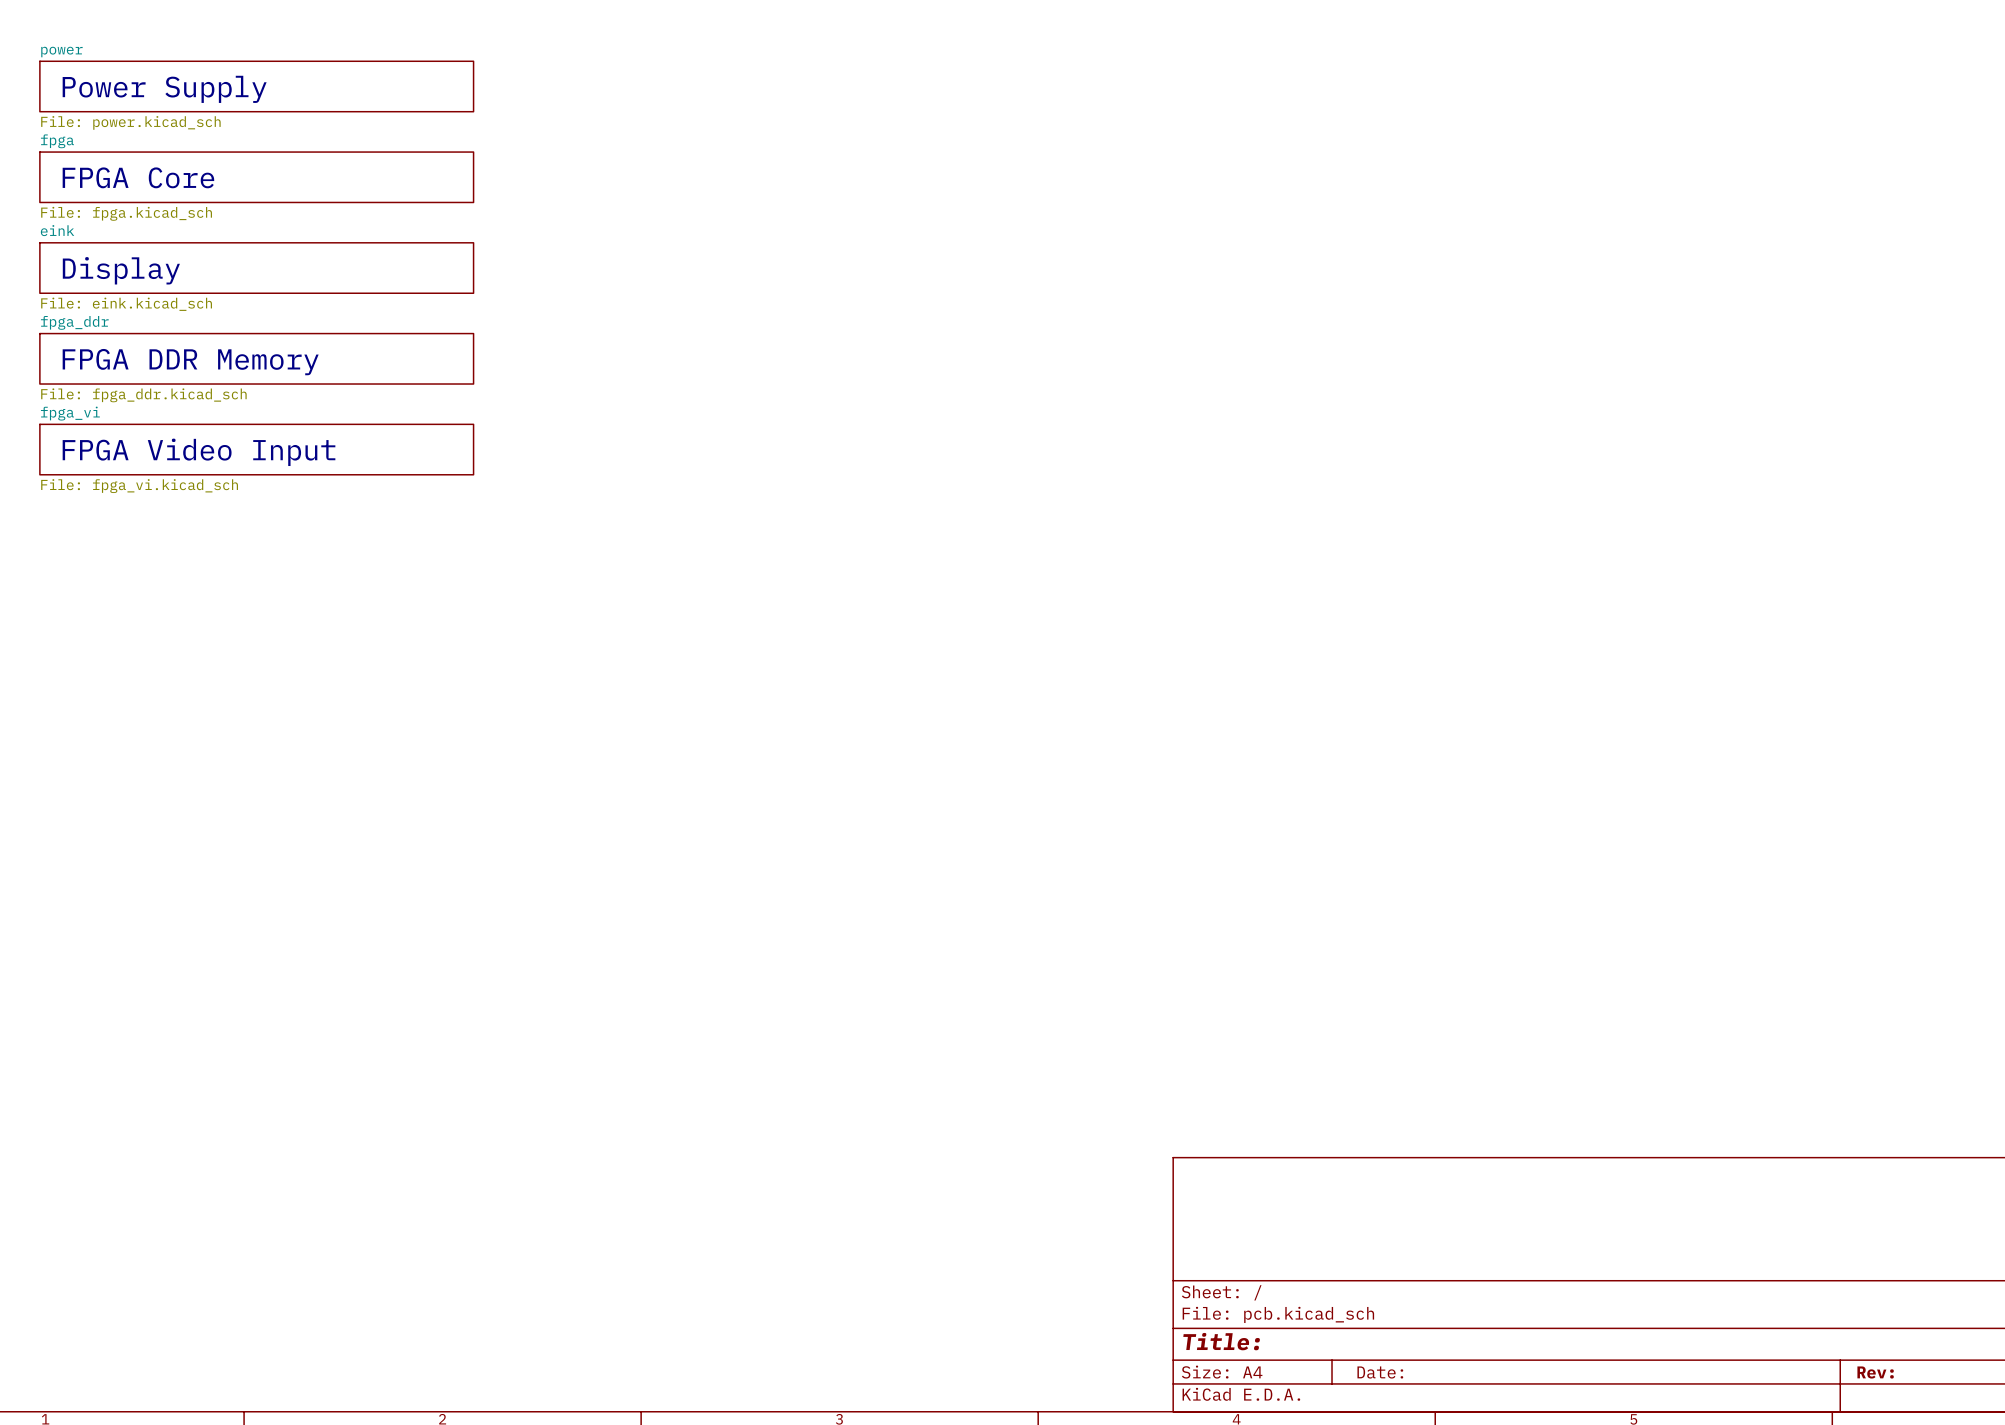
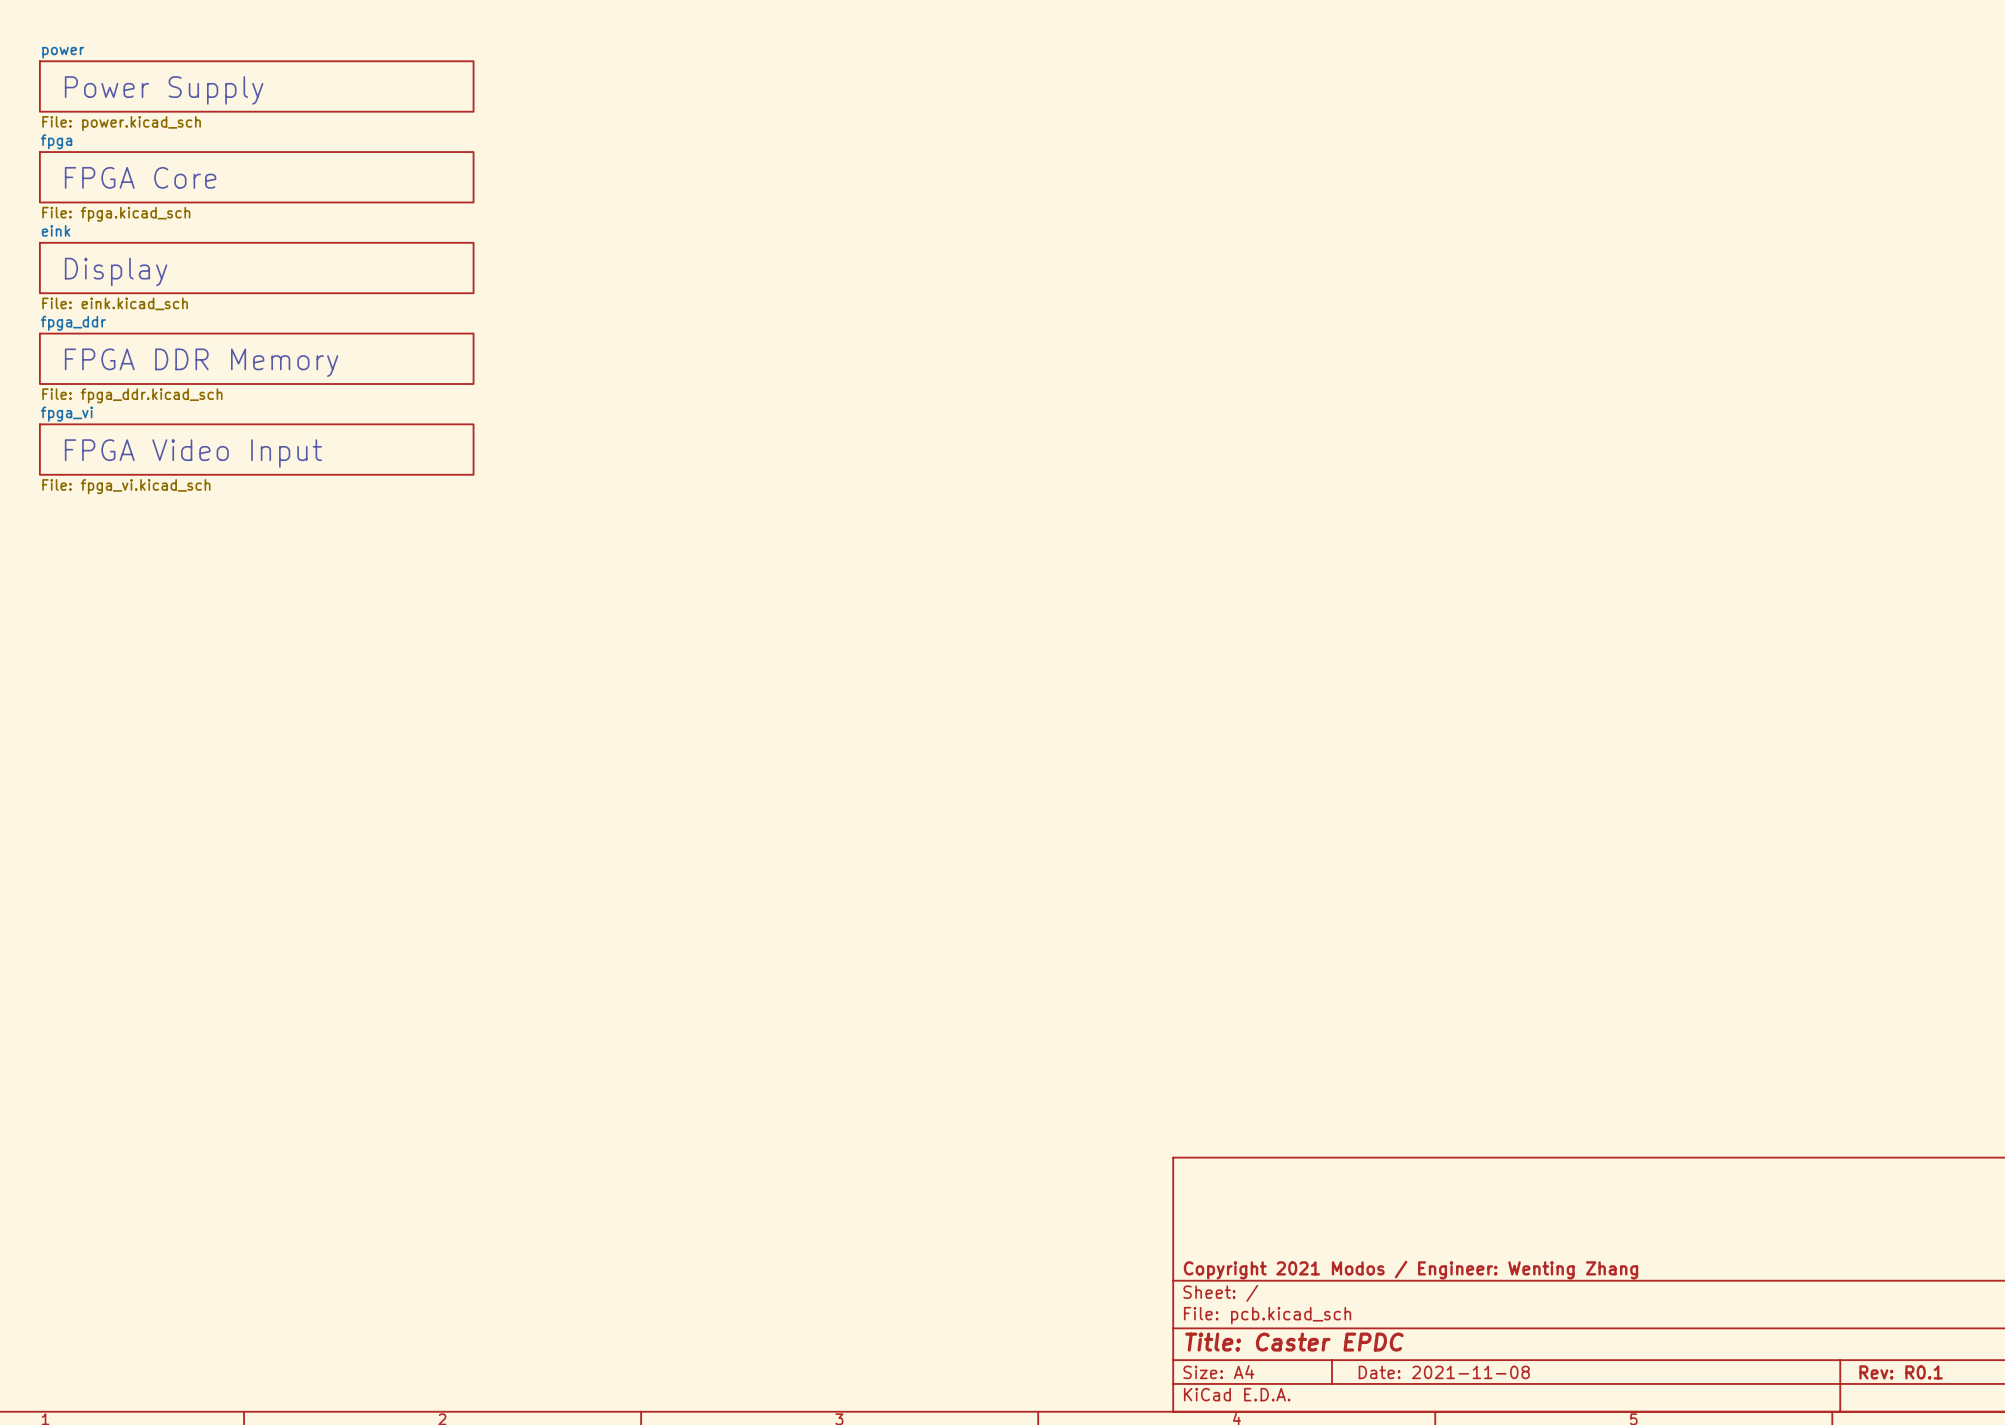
title block: none -> Copyright 2021 Modos / Engineer: Wenting Zhang (1411, 1270)
title block: Title: (1221, 1341) -> Title: Caster EPDC (1294, 1342)
title block: Date: (1380, 1372) -> Date: 2021-11-08 (1444, 1372)
title block: Rev: (1875, 1372) -> Rev: R0.1 (1901, 1372)

